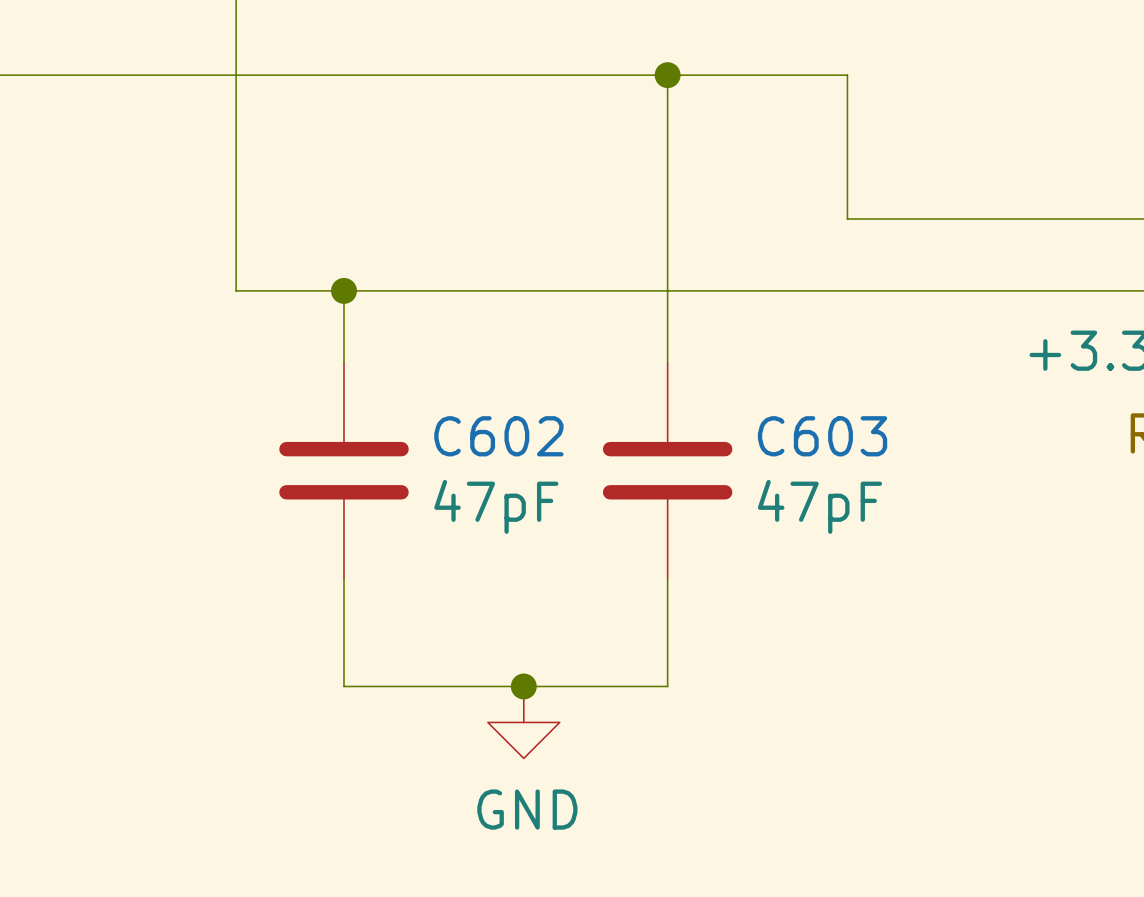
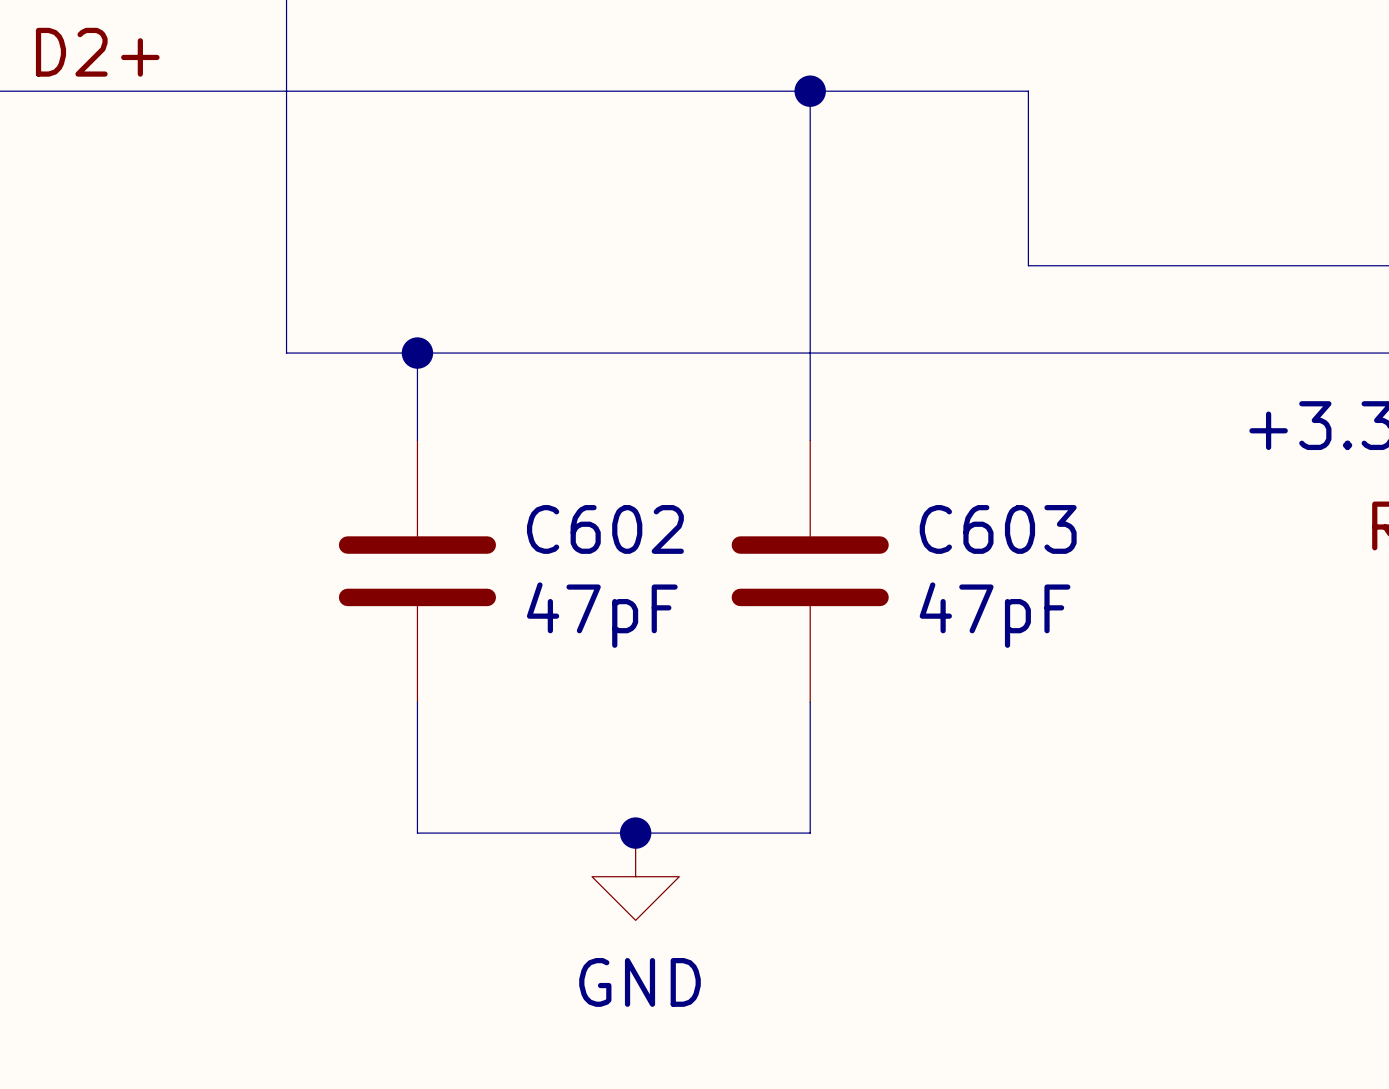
label: none -> D2+ (97, 52)

